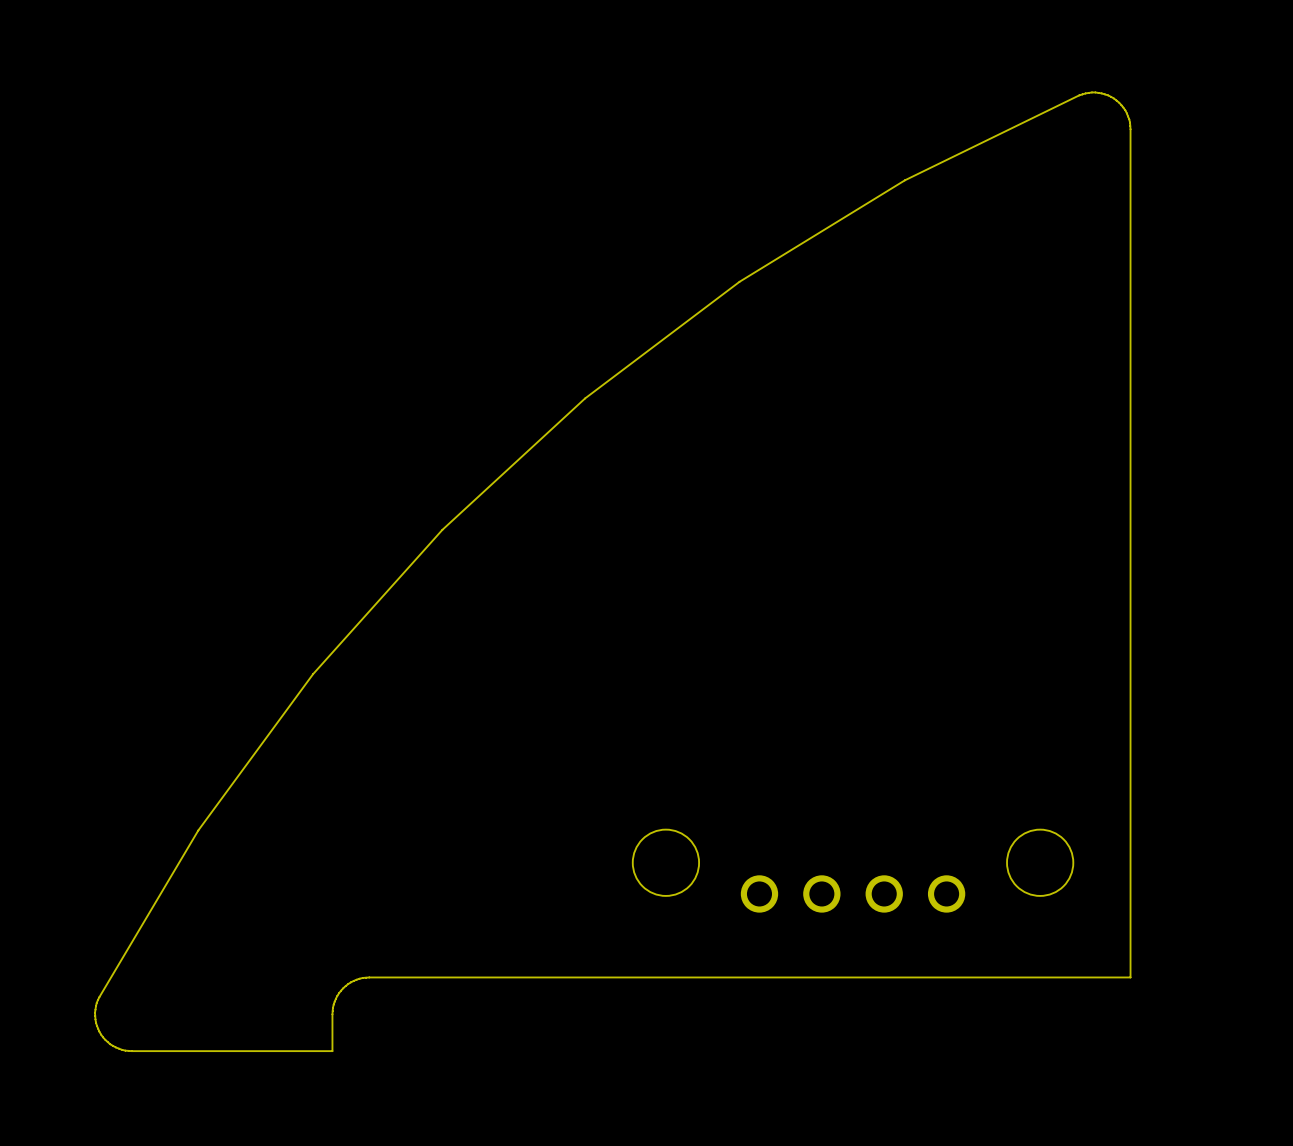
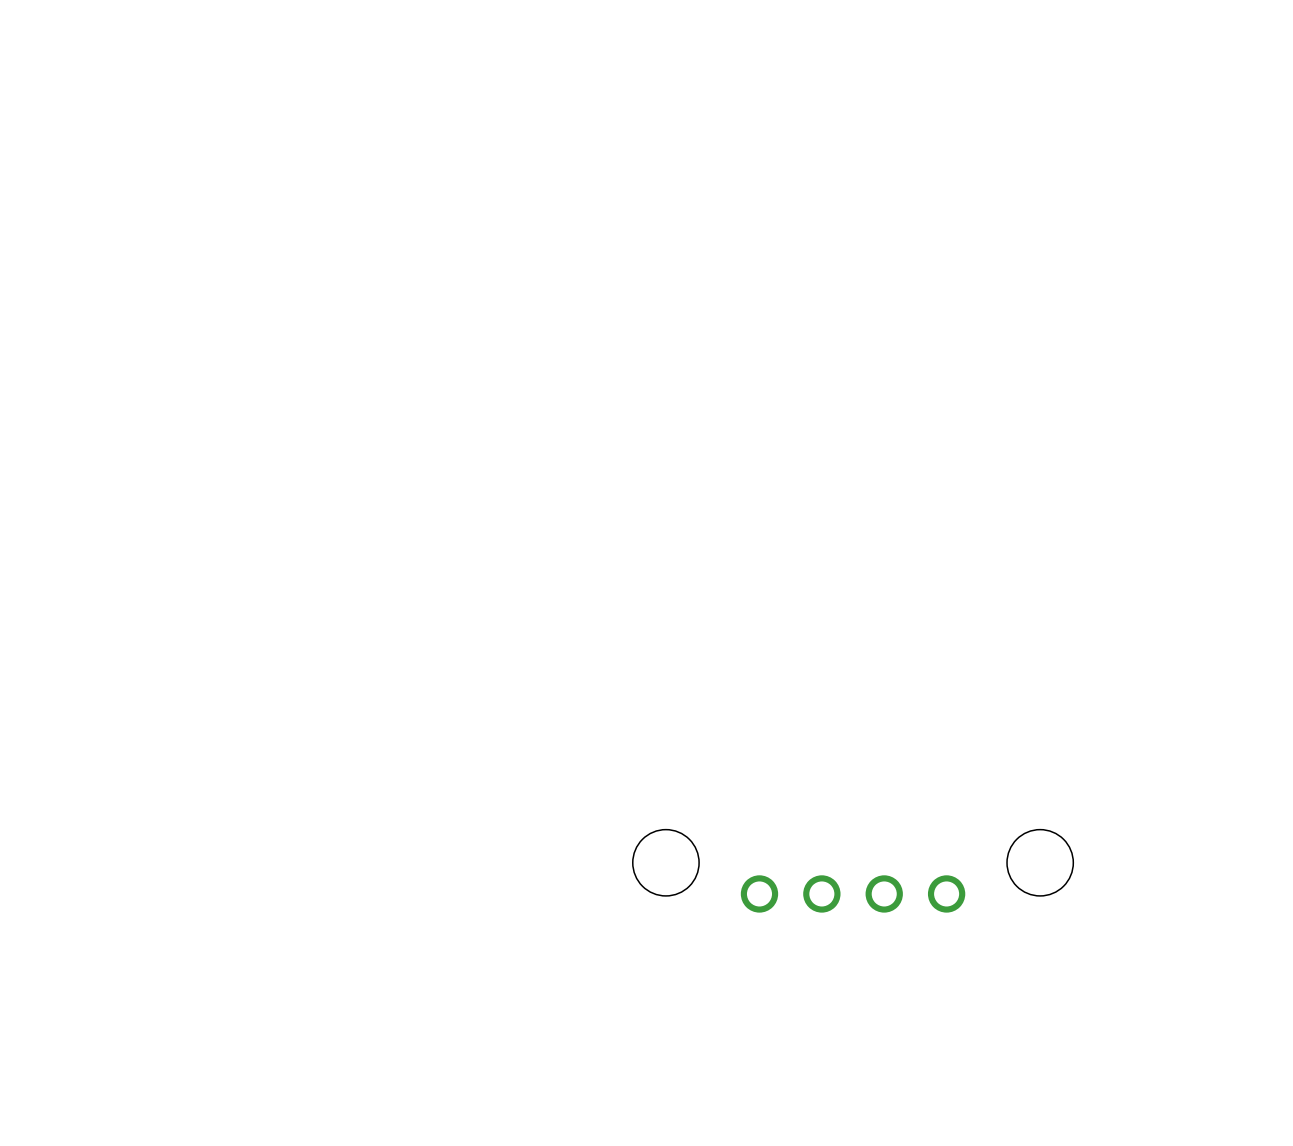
board edge: (1095, 92) (1079, 95) (904, 180) (739, 281) (585, 398) (442, 529) (313, 674) (198, 830) (97, 1000) (94, 1012) (95, 1022) (105, 1039) (115, 1047) (131, 1051) (332, 1051) (332, 1014) (335, 998) (348, 984) (359, 978) (369, 977) (1130, 977) (1130, 129) (1126, 113) (1119, 102) (1108, 95) (1095, 92) -> none

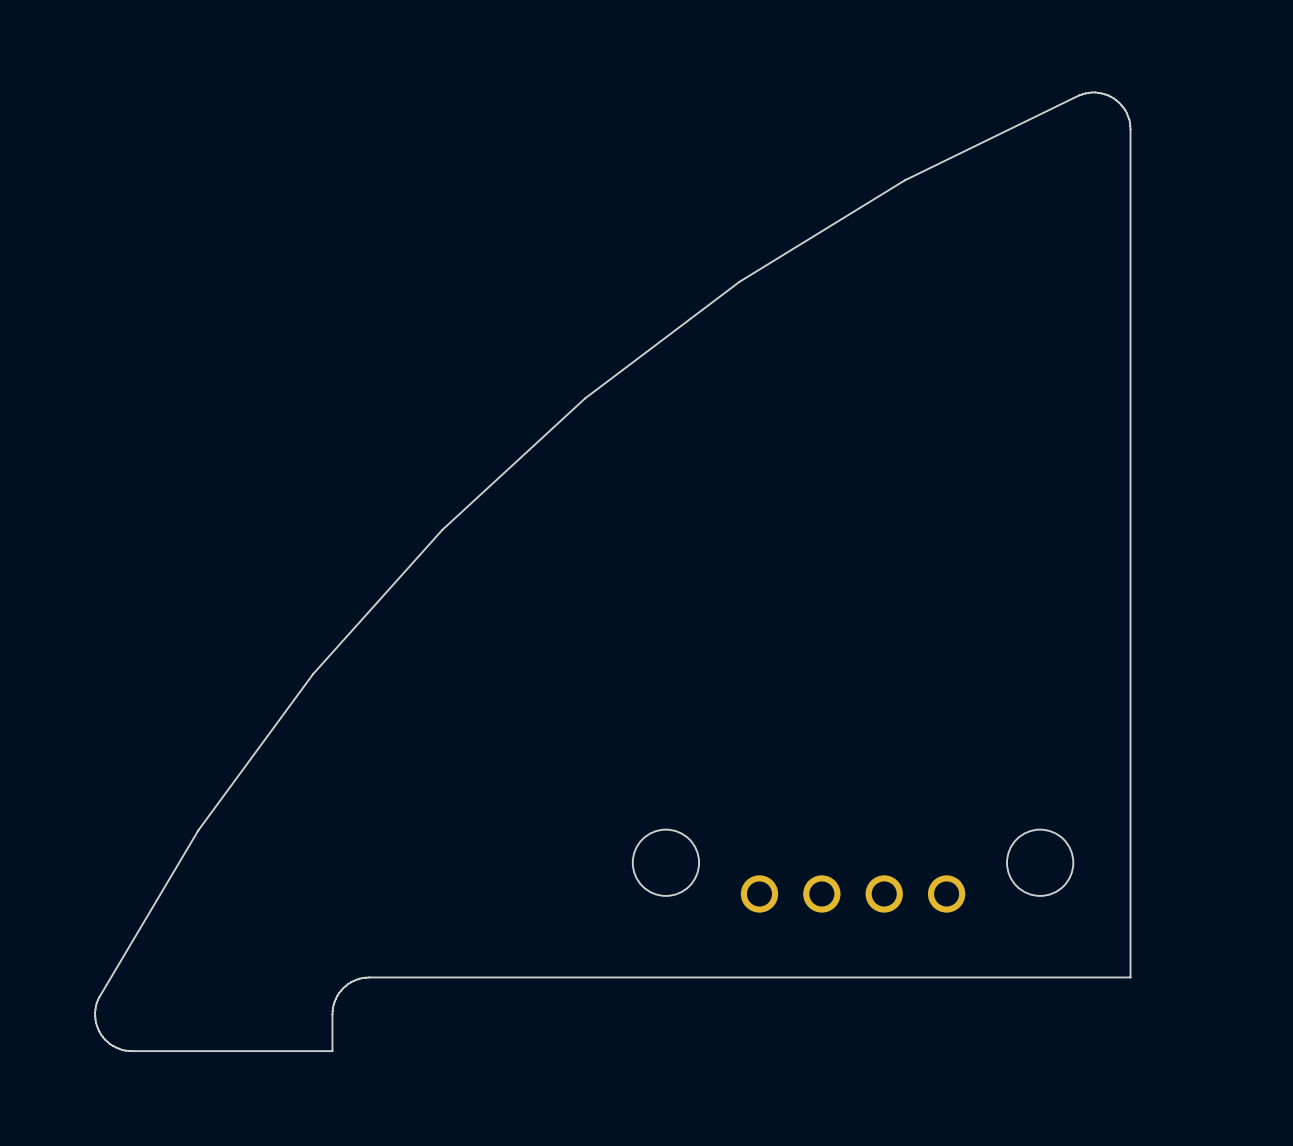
board edge: none -> (1095, 92) (1079, 95) (904, 180) (739, 281) (585, 398) (442, 529) (313, 674) (198, 830) (97, 1000) (94, 1012) (95, 1022) (105, 1039) (115, 1047) (131, 1051) (332, 1051) (332, 1014) (335, 998) (348, 984) (359, 978) (369, 977) (1130, 977) (1130, 129) (1126, 113) (1119, 102) (1108, 95) (1095, 92)

